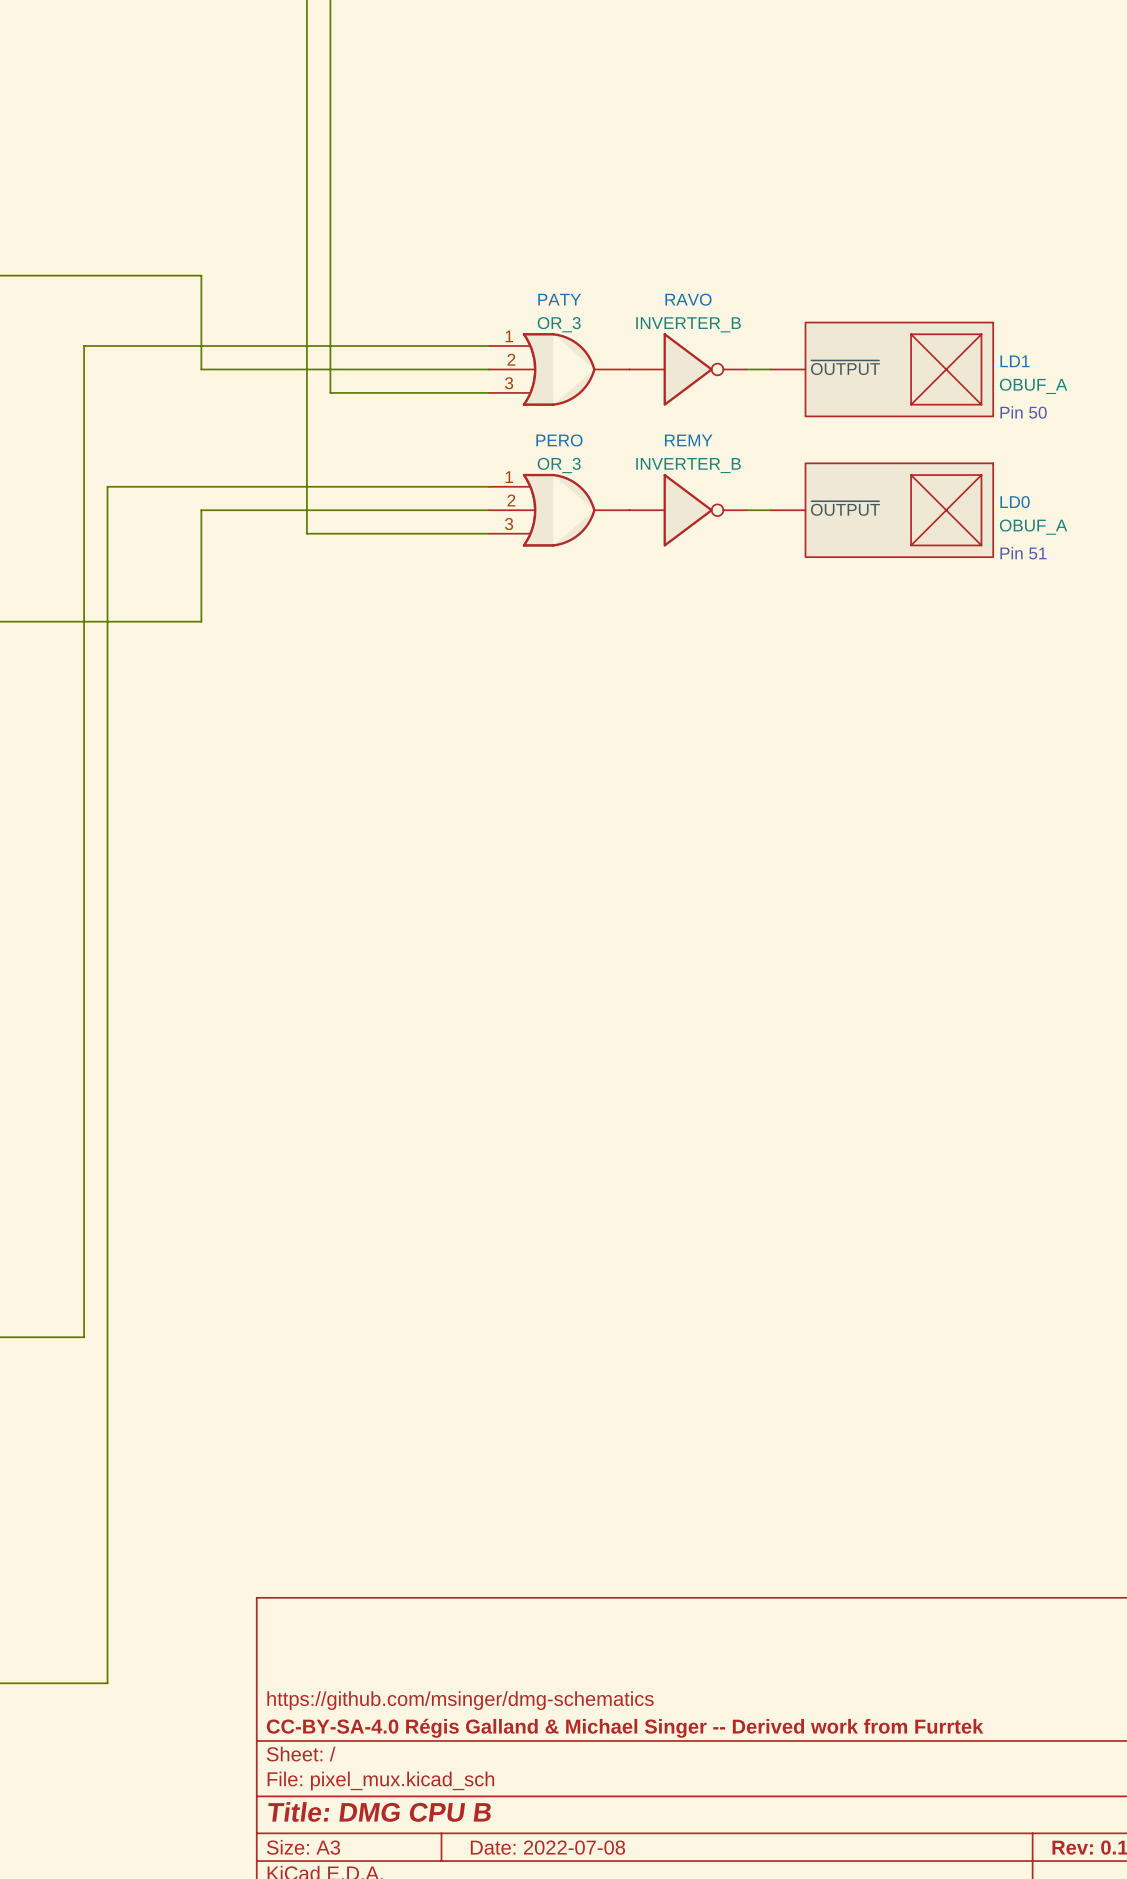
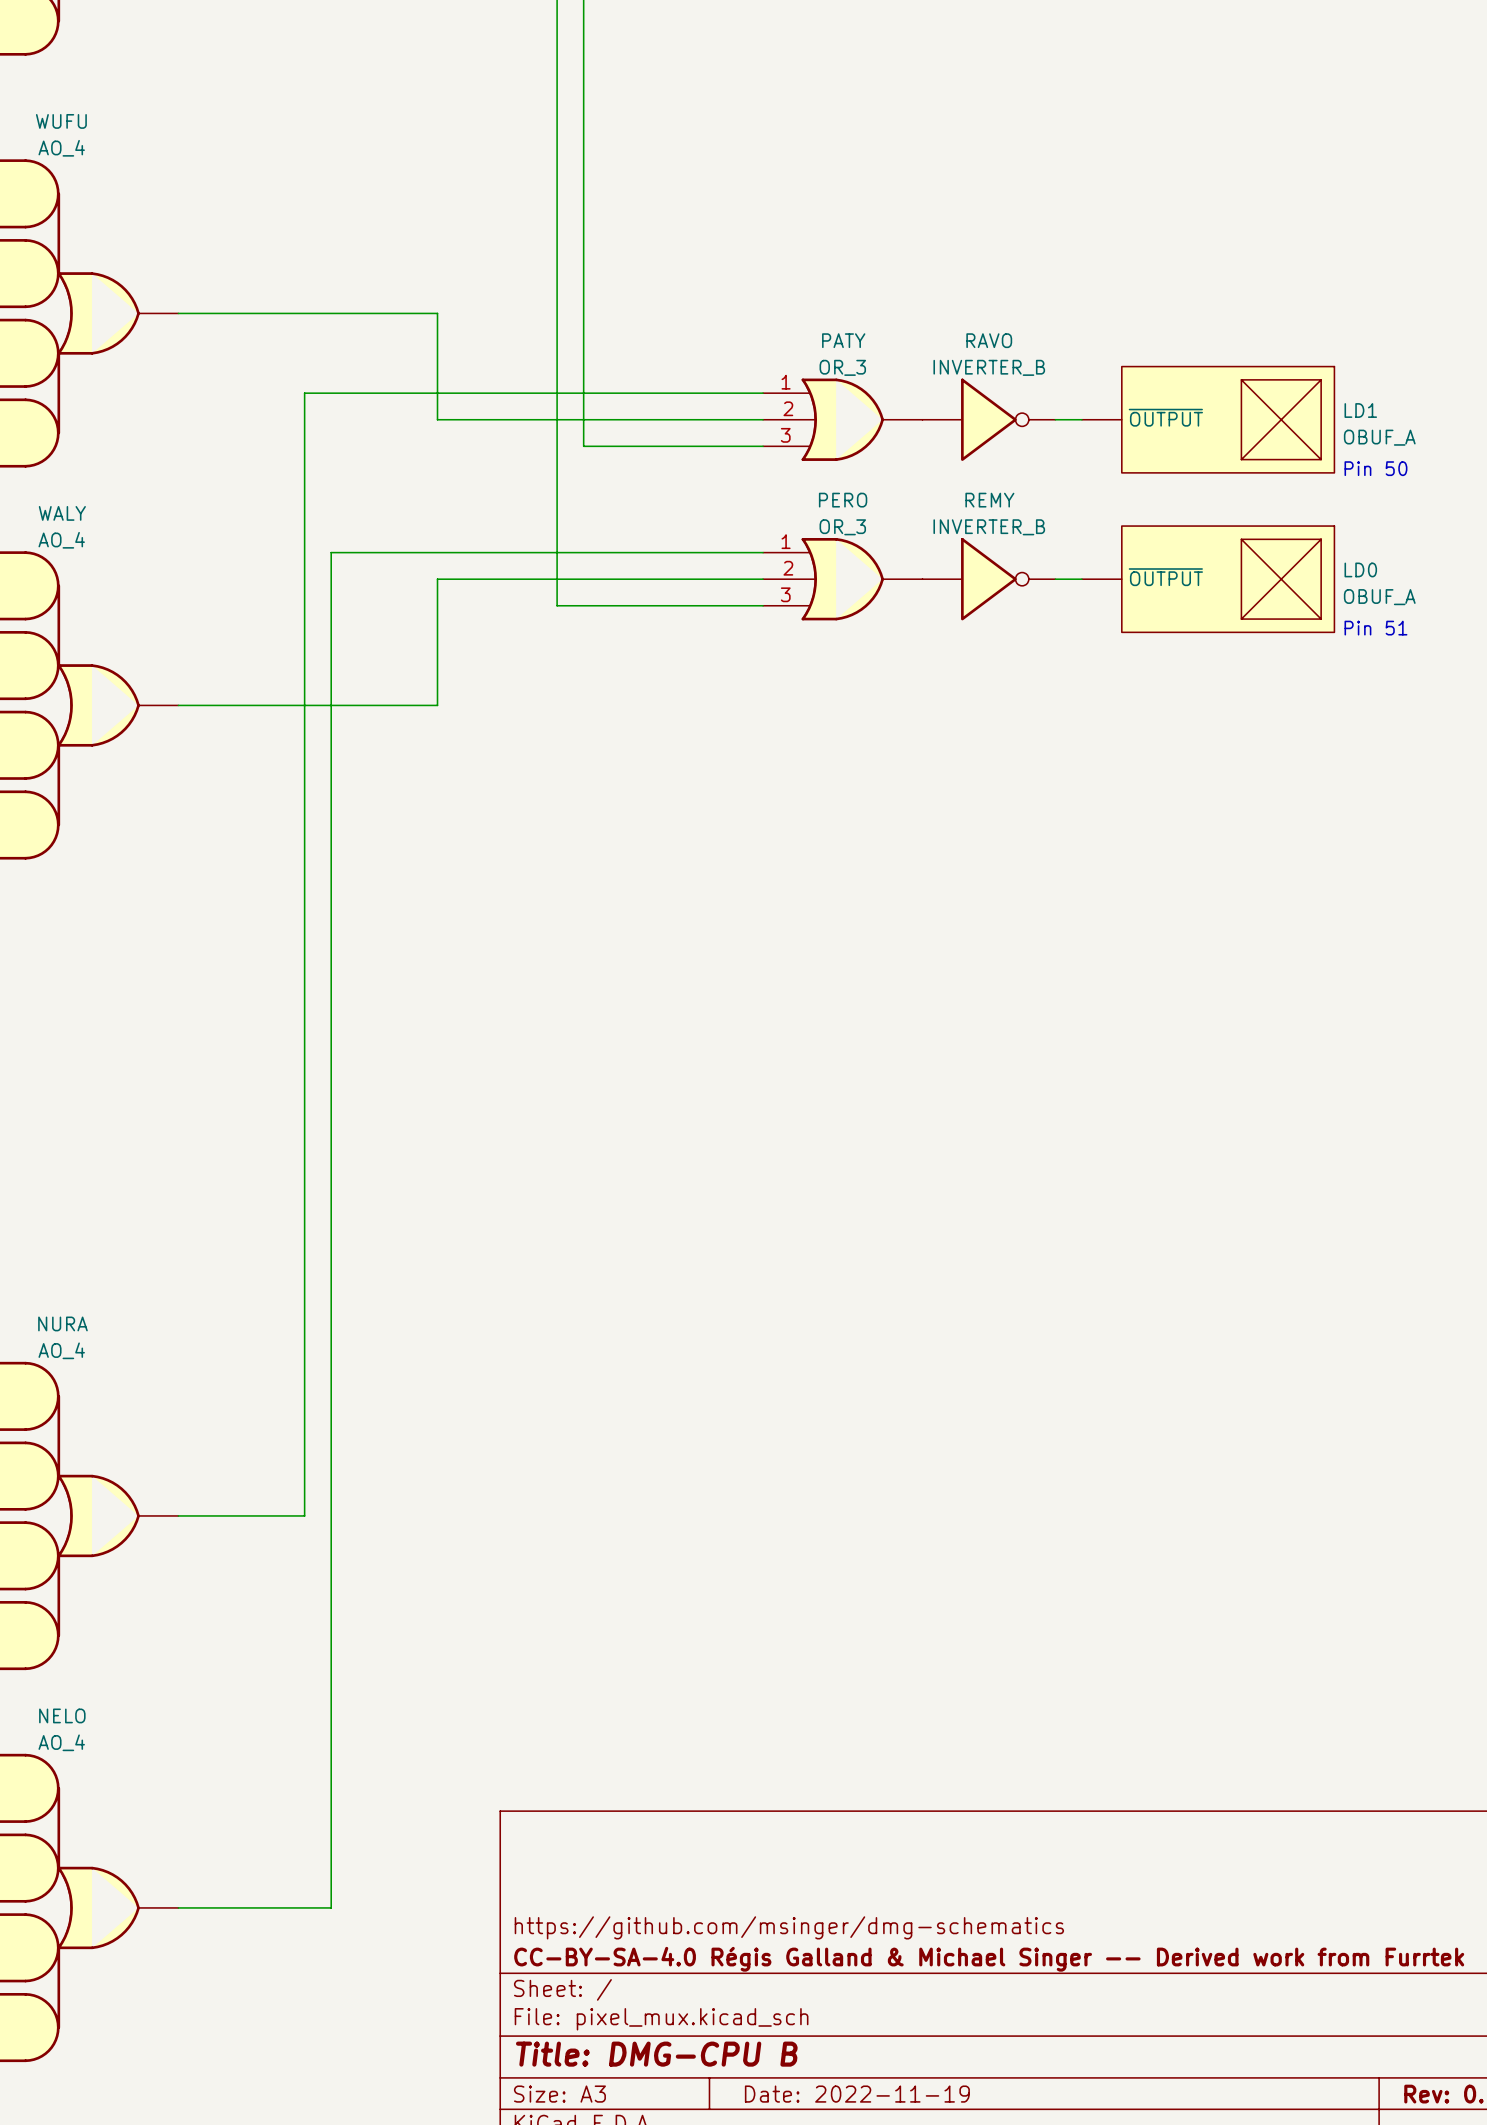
title block: Title: DMG CPU B (379, 1811) -> Title: DMG-CPU B (656, 2054)
title block: Date: 2022-07-08 (547, 1847) -> Date: 2022-11-19 (857, 2094)

